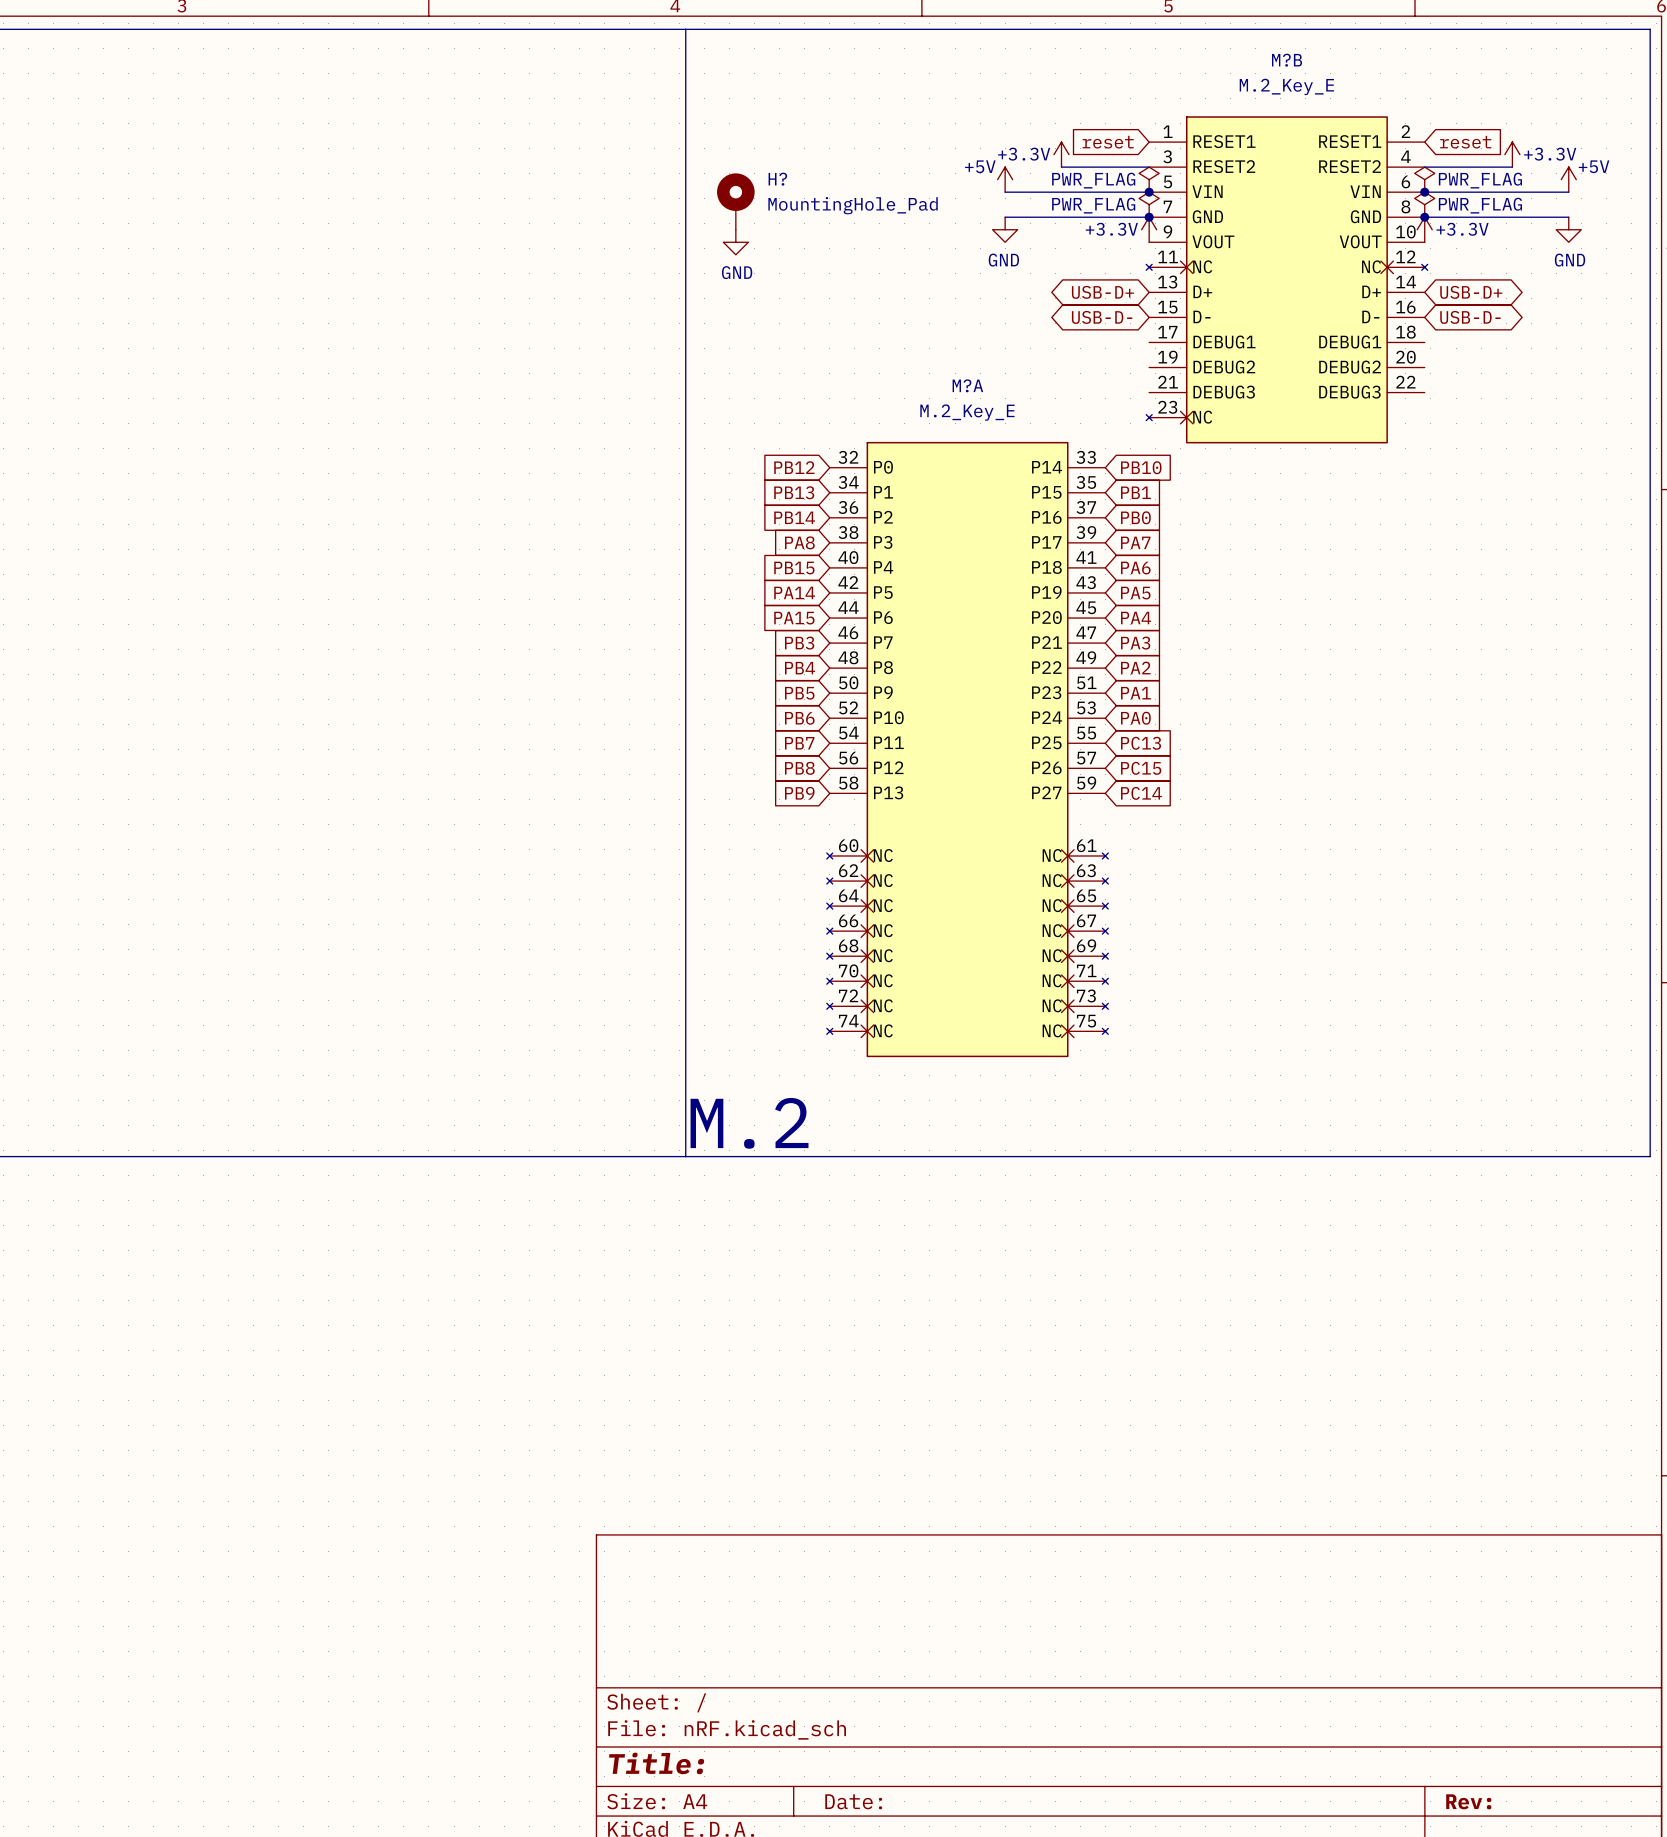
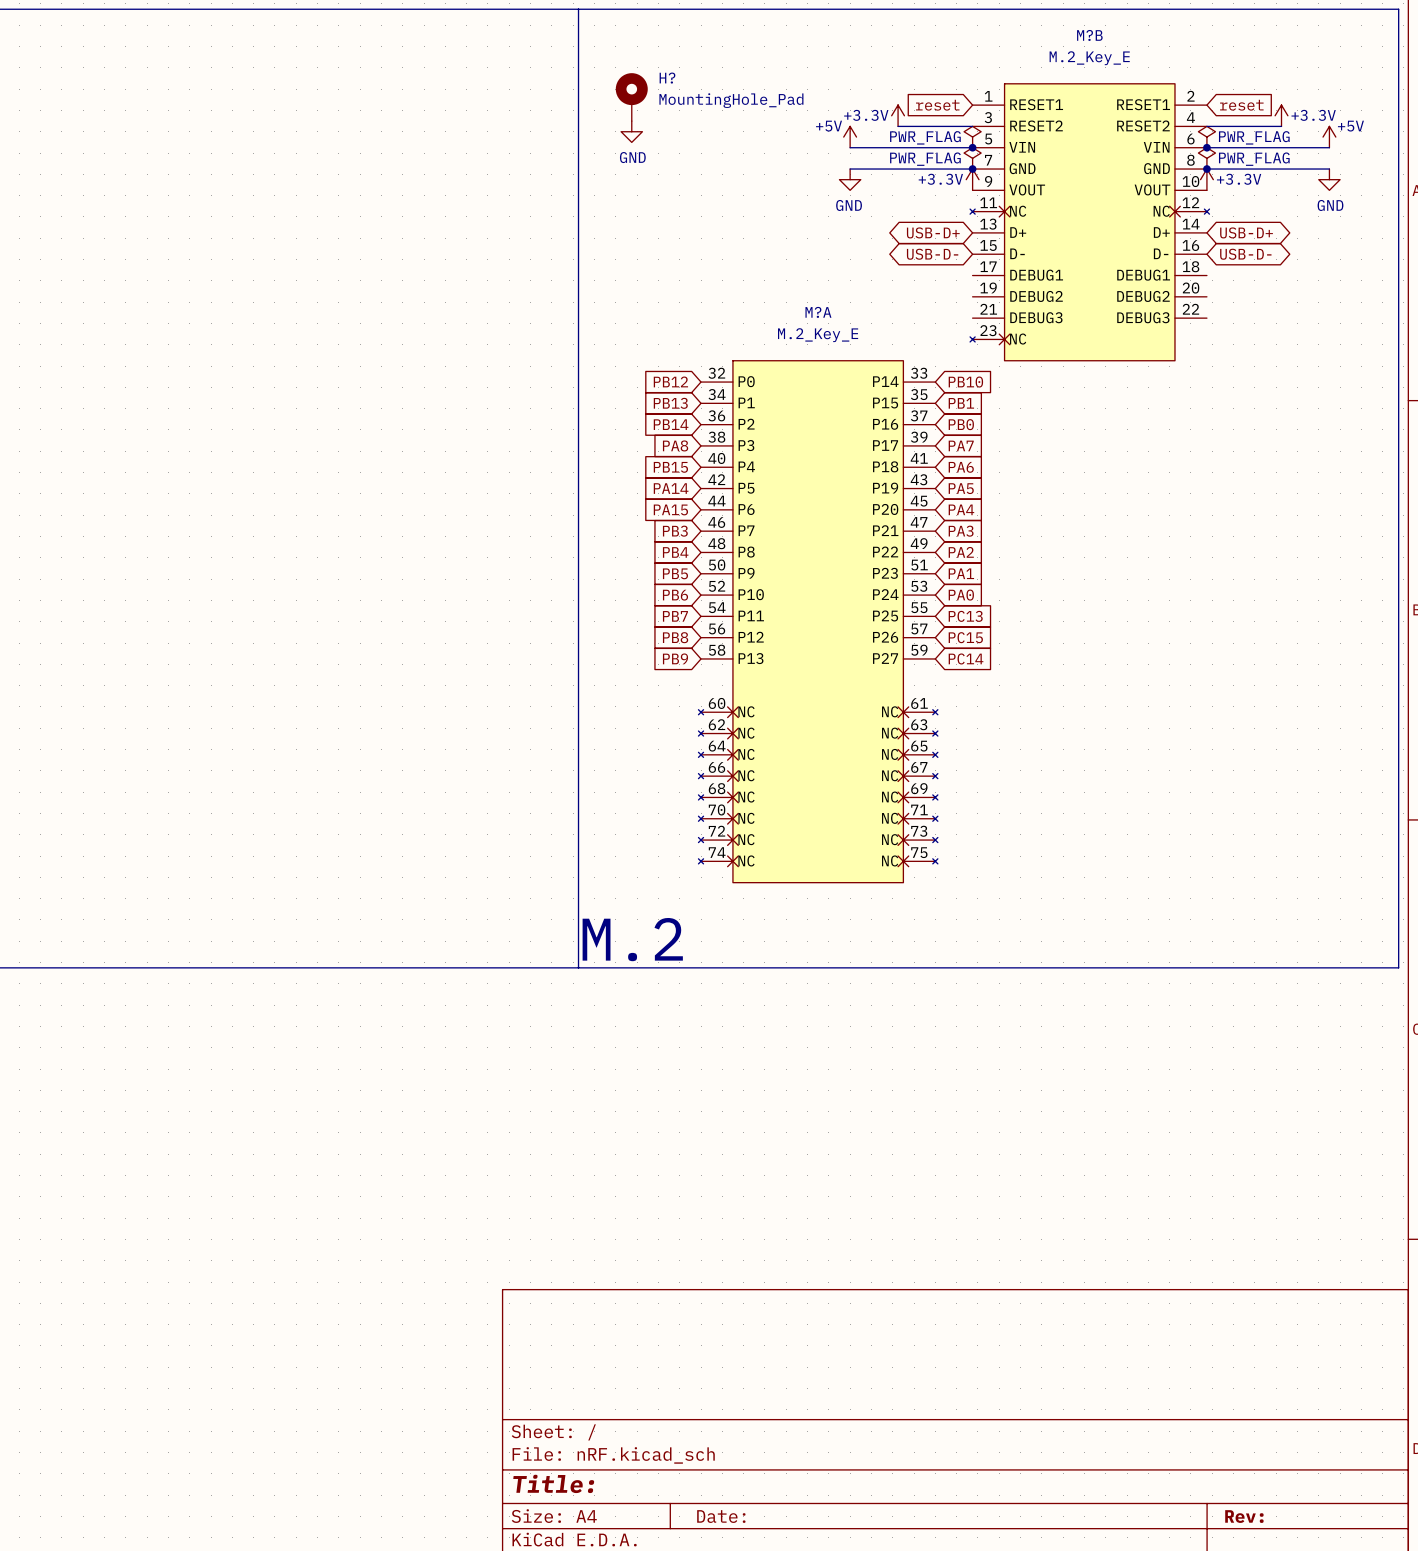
H? position: (735, 201) -> (631, 97)
power symbol position: GND (735, 242) -> GND (631, 131)

